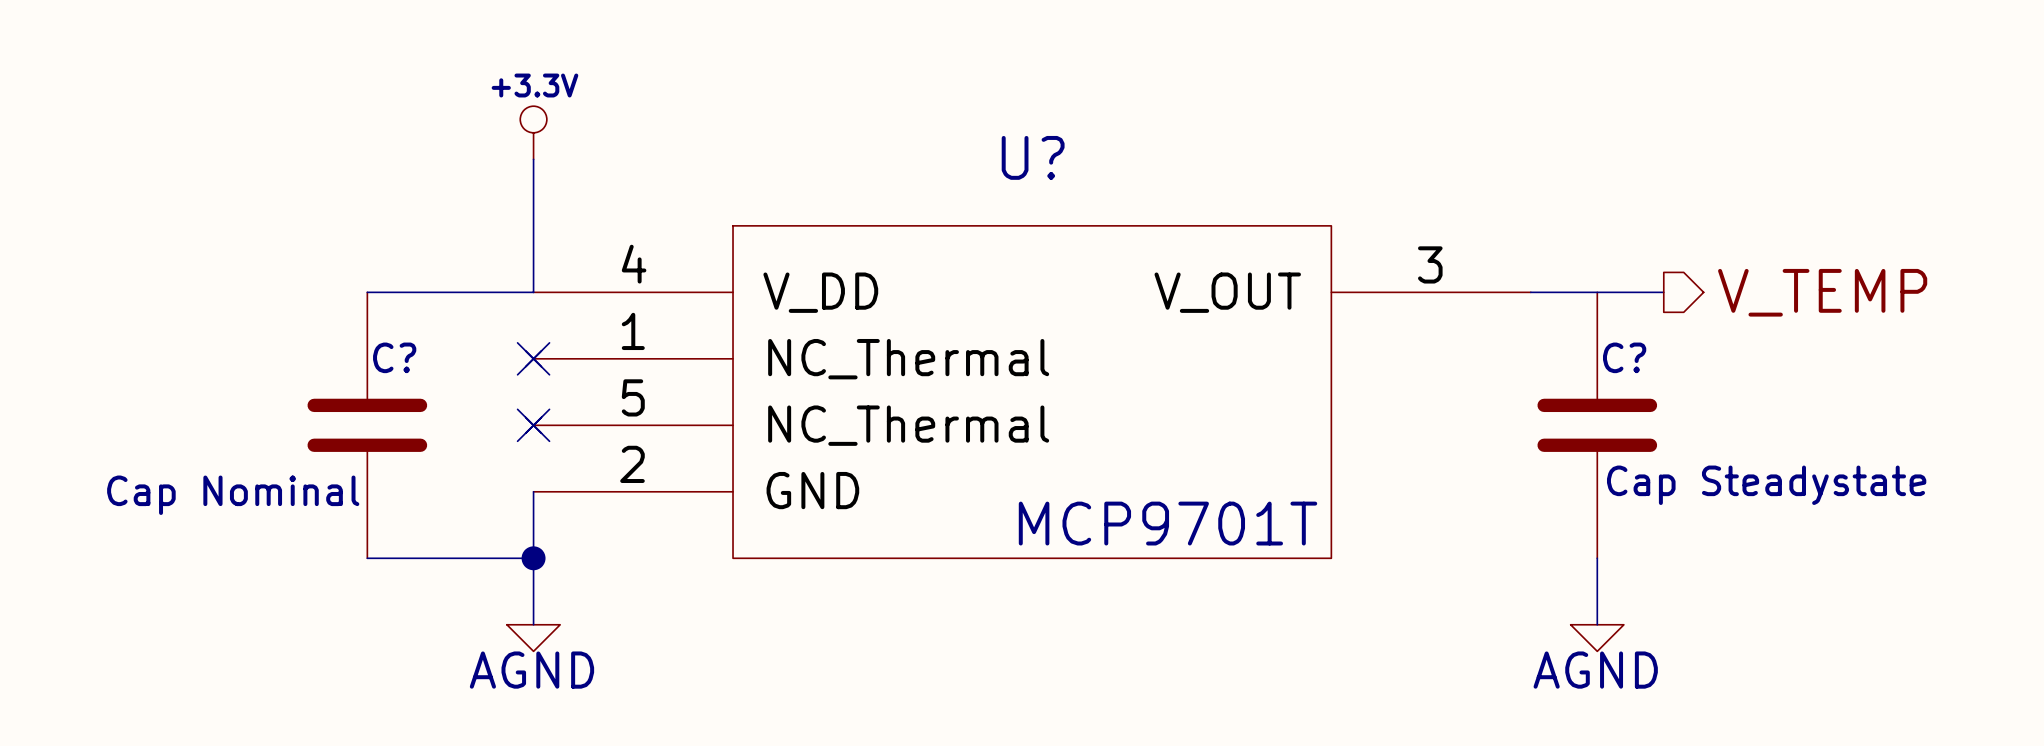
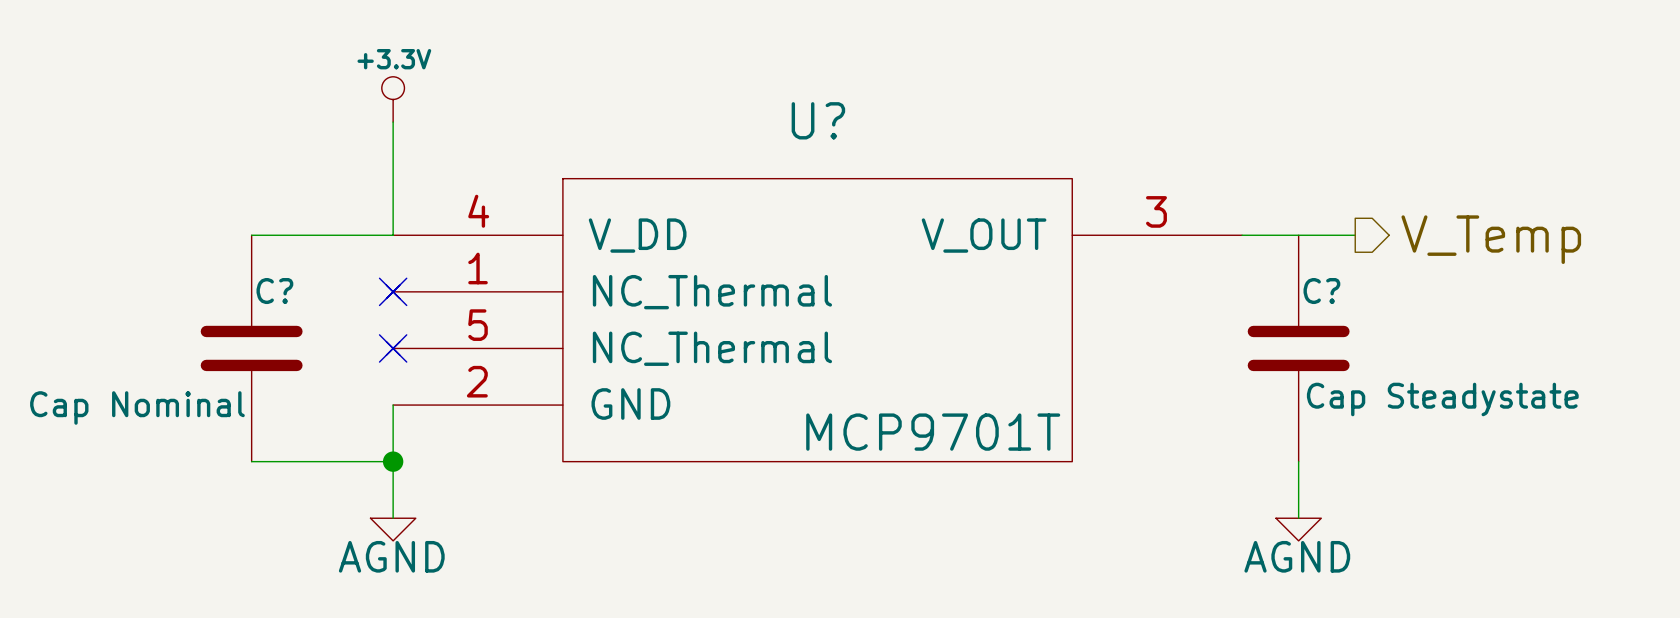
hierarchical label: V_TEMP (1822, 292) -> V_Temp (1491, 239)

